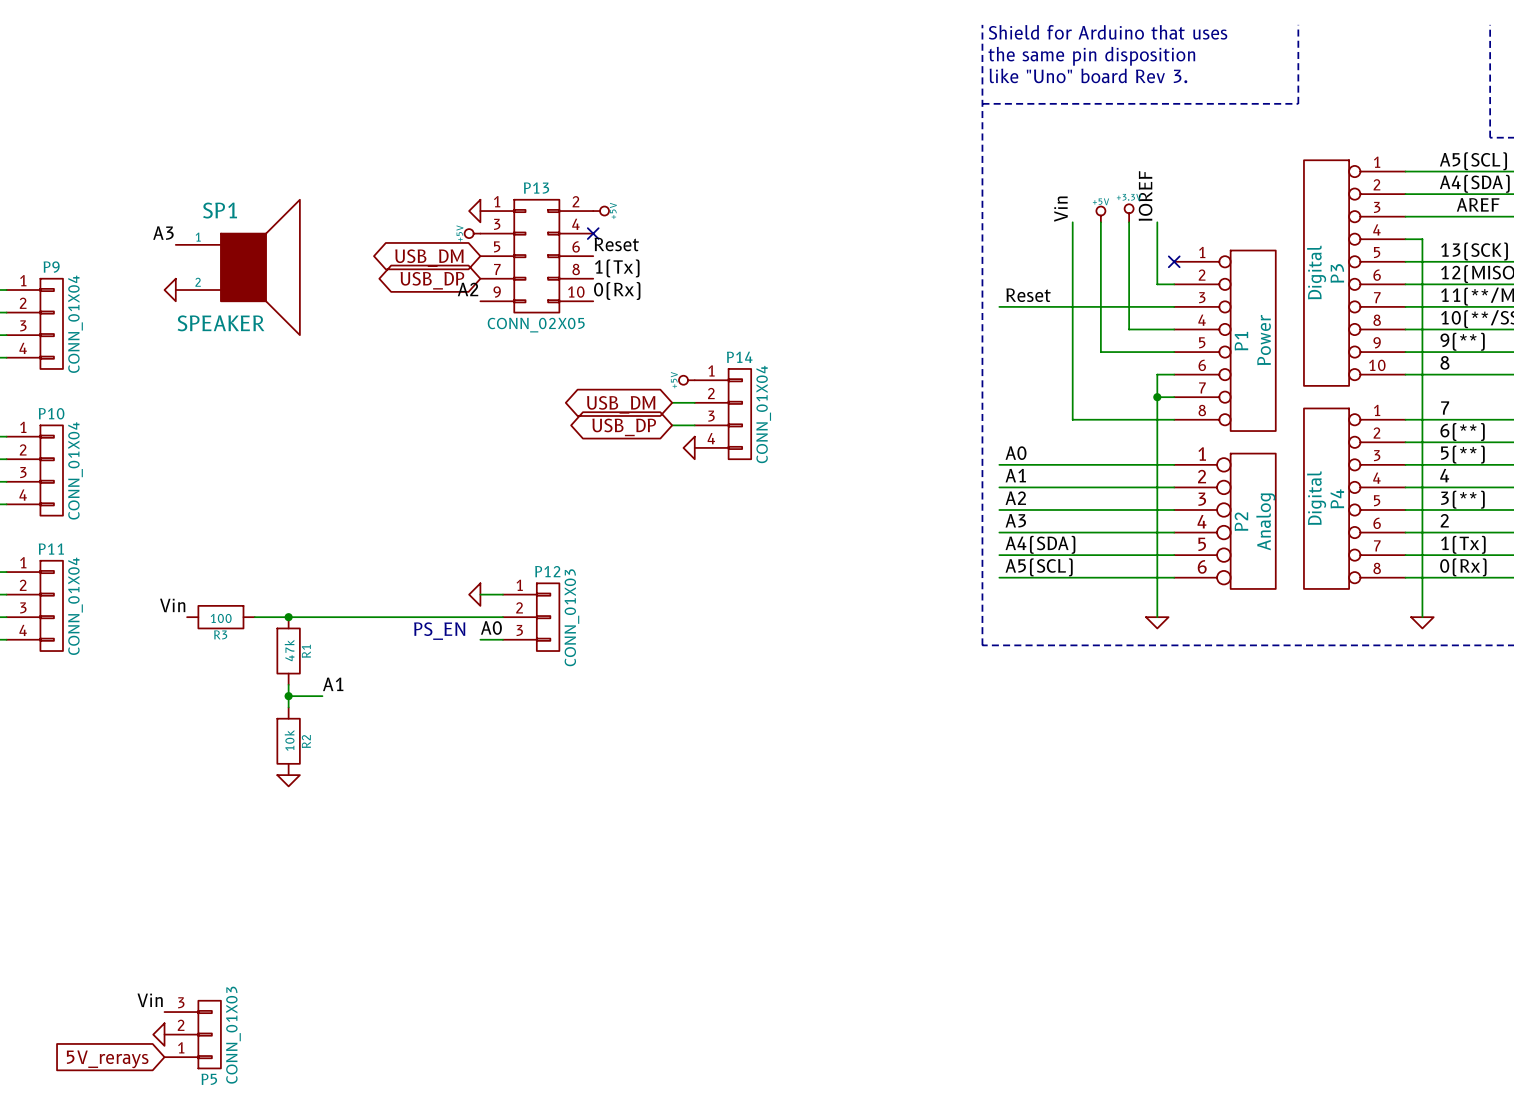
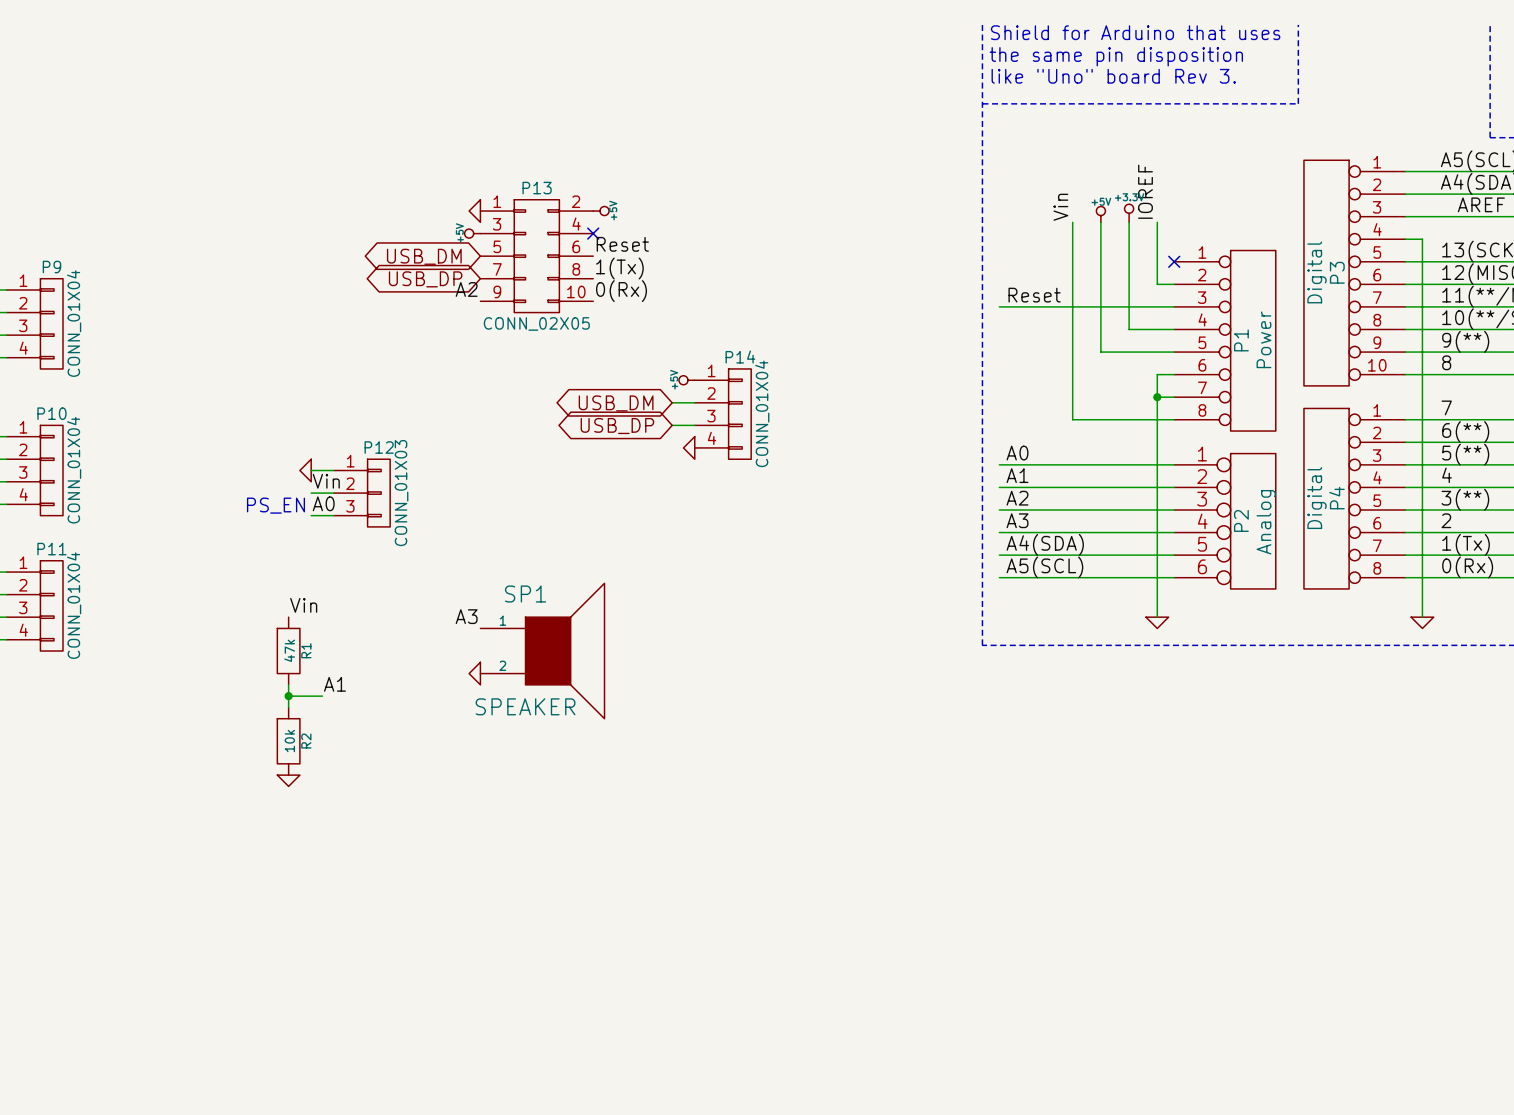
label: A3 (163, 233) -> none
SP1 position: (237, 267) -> (542, 651)
power symbol: (170, 290) -> none
power symbol: none -> (305, 470)
label: none -> Vin (326, 481)
wire: none -> (311, 493) (333, 493)
power symbol position: (474, 594) -> (474, 673)
wire: (480, 594) (502, 594) -> (311, 470) (333, 470)
label: Vin (172, 605) -> none
label: none -> Vin (303, 605)
label: none -> A3 (466, 616)
R3: 100 (220, 617) -> none
wire: (254, 617) (502, 617) -> none
junction: (288, 617) -> none
P12 position: (531, 617) -> (361, 493)
label position: A0 (491, 628) -> A0 (323, 503)
text position: PS_EN (439, 631) -> PS_EN (275, 505)
wire: (480, 639) (502, 639) -> (311, 515) (333, 515)
label: Vin (150, 1000) -> none
power symbol: (158, 1034) -> none
P5: CONN_01X03 (192, 1034) -> none
global label: 5V_rerays (107, 1059) -> none

